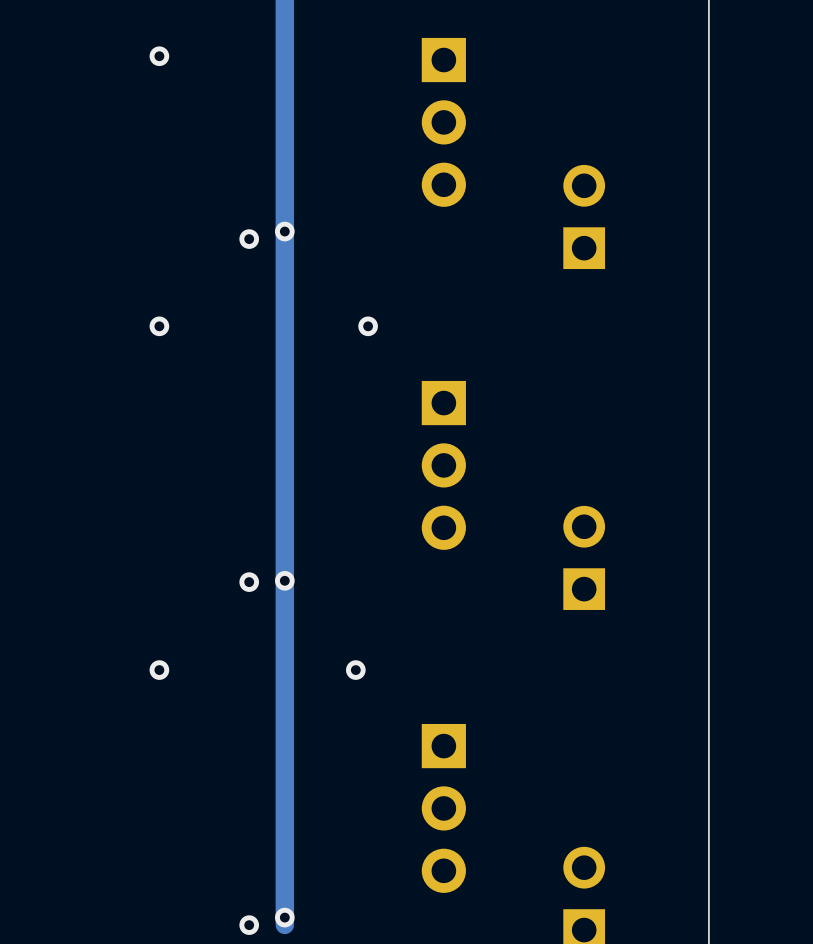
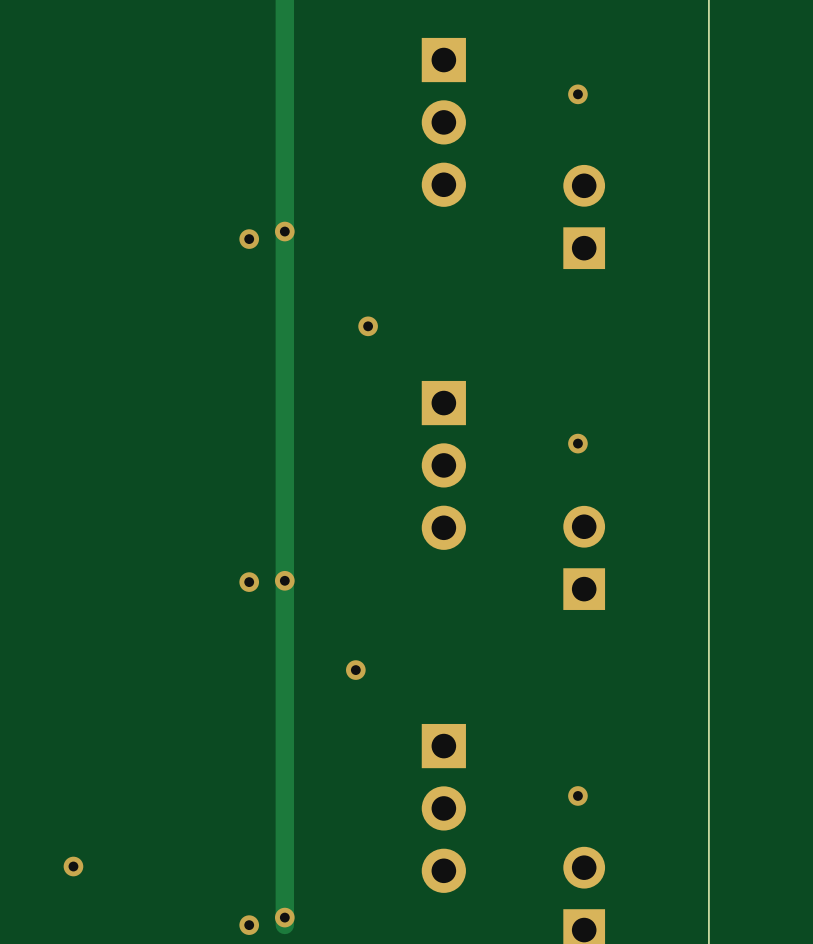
via: (159, 56) -> none
via: none -> (577, 94)
via: (159, 326) -> none
via: none -> (577, 443)
via: (159, 670) -> none
via: none -> (577, 795)
via: none -> (73, 866)

